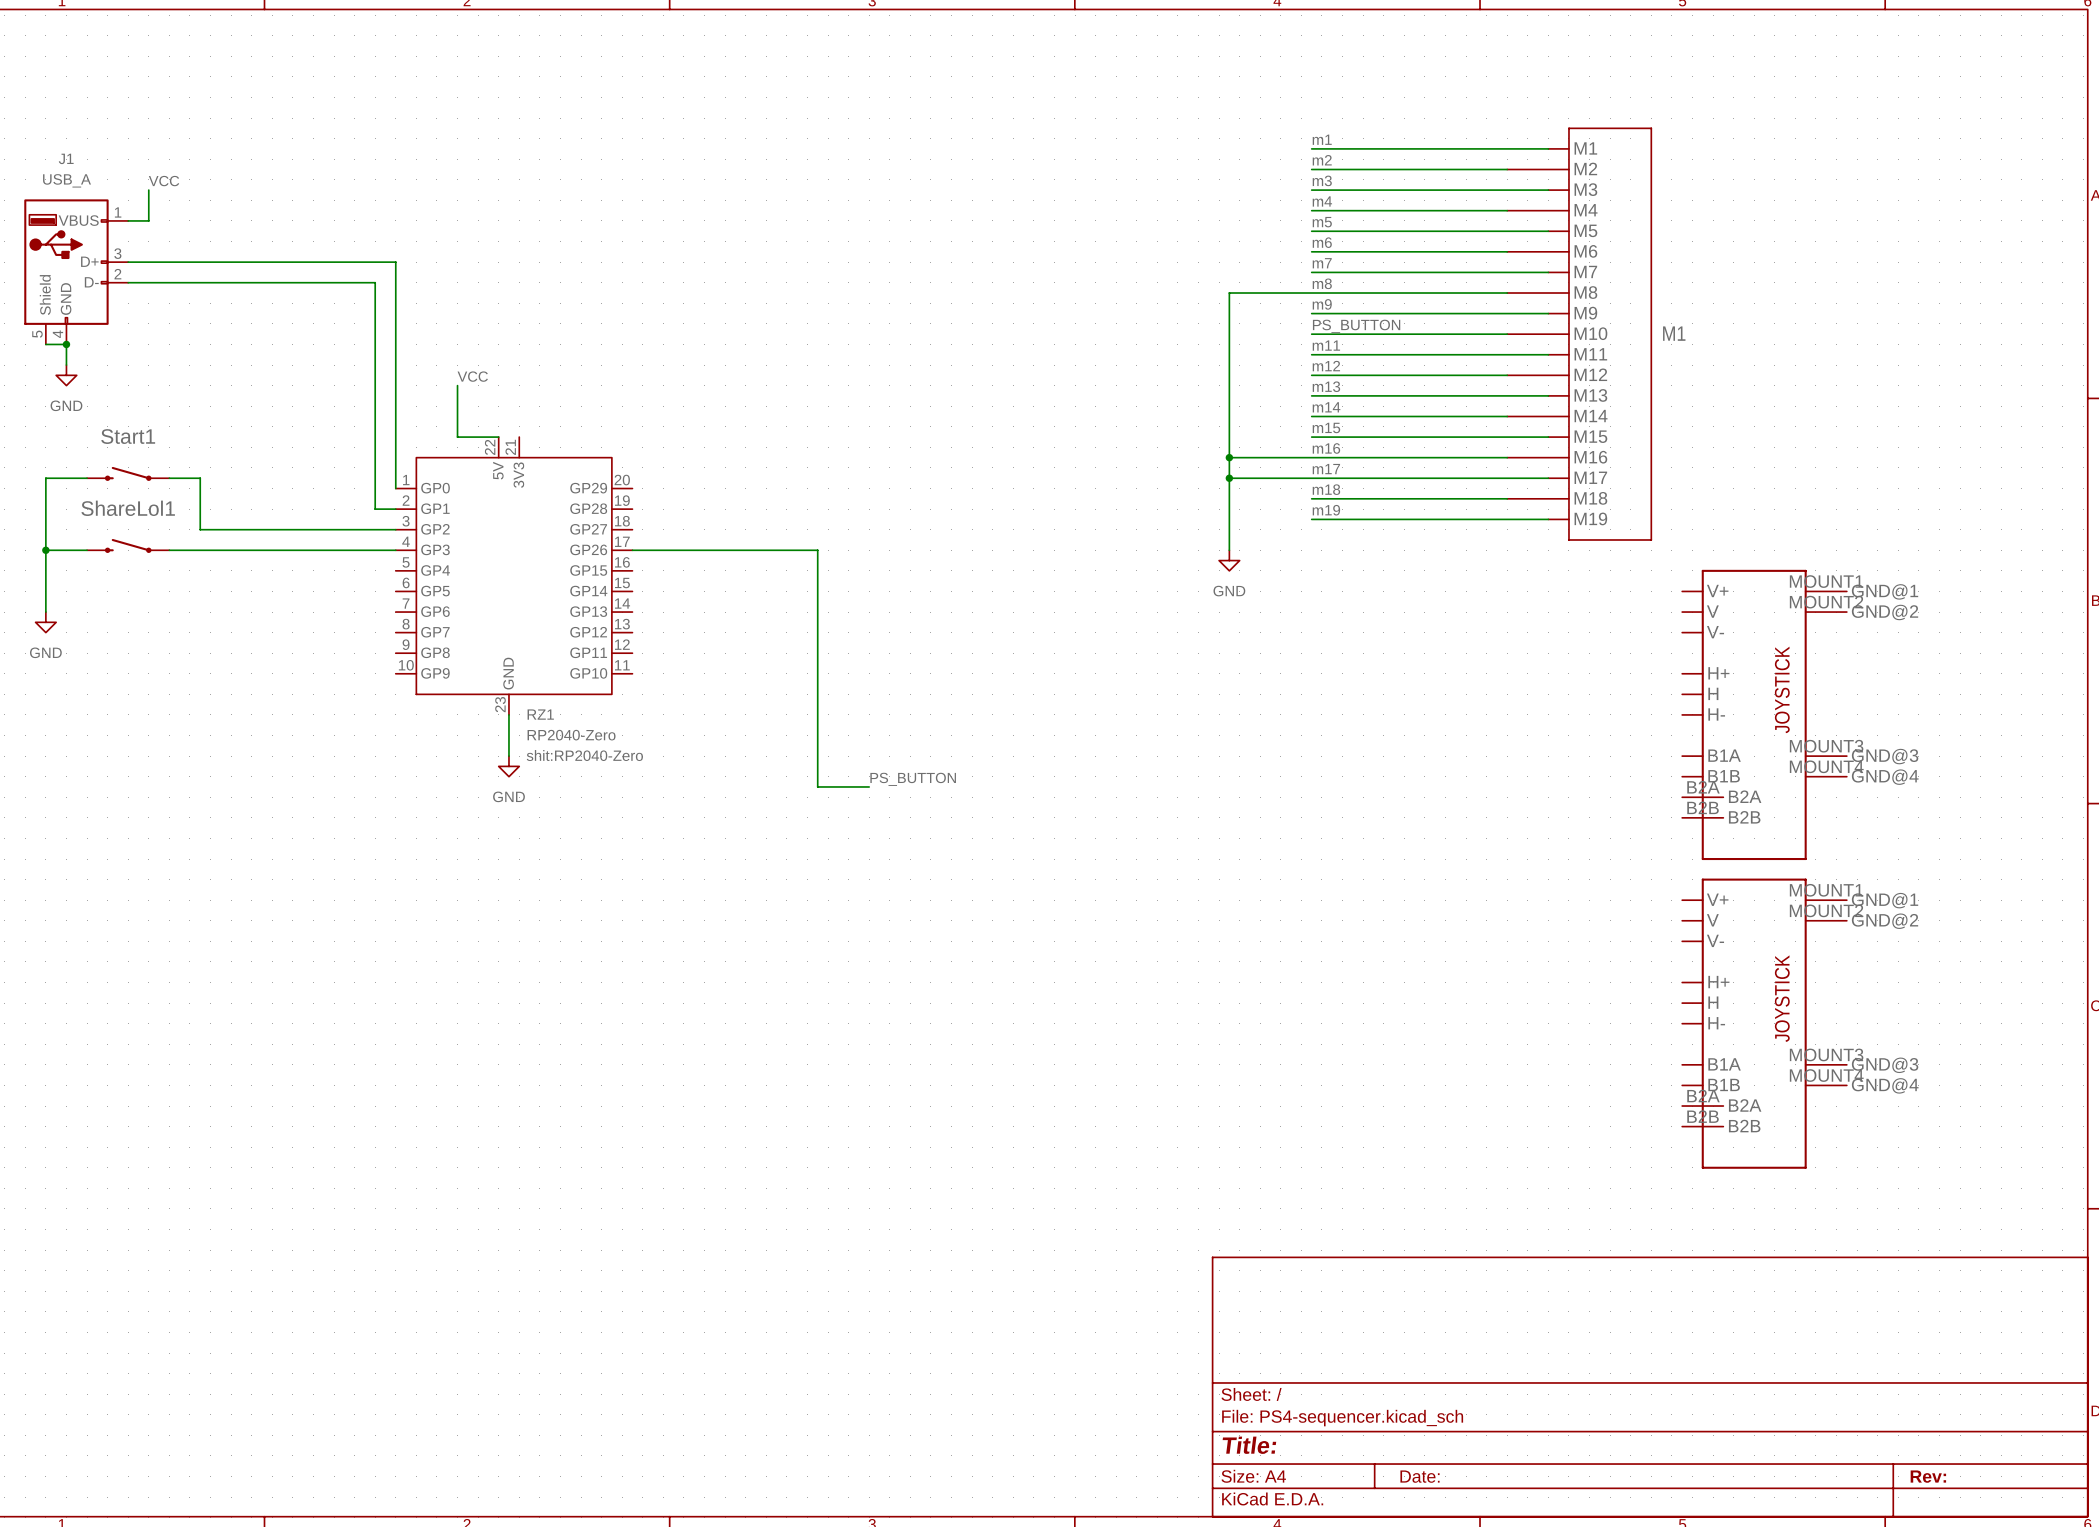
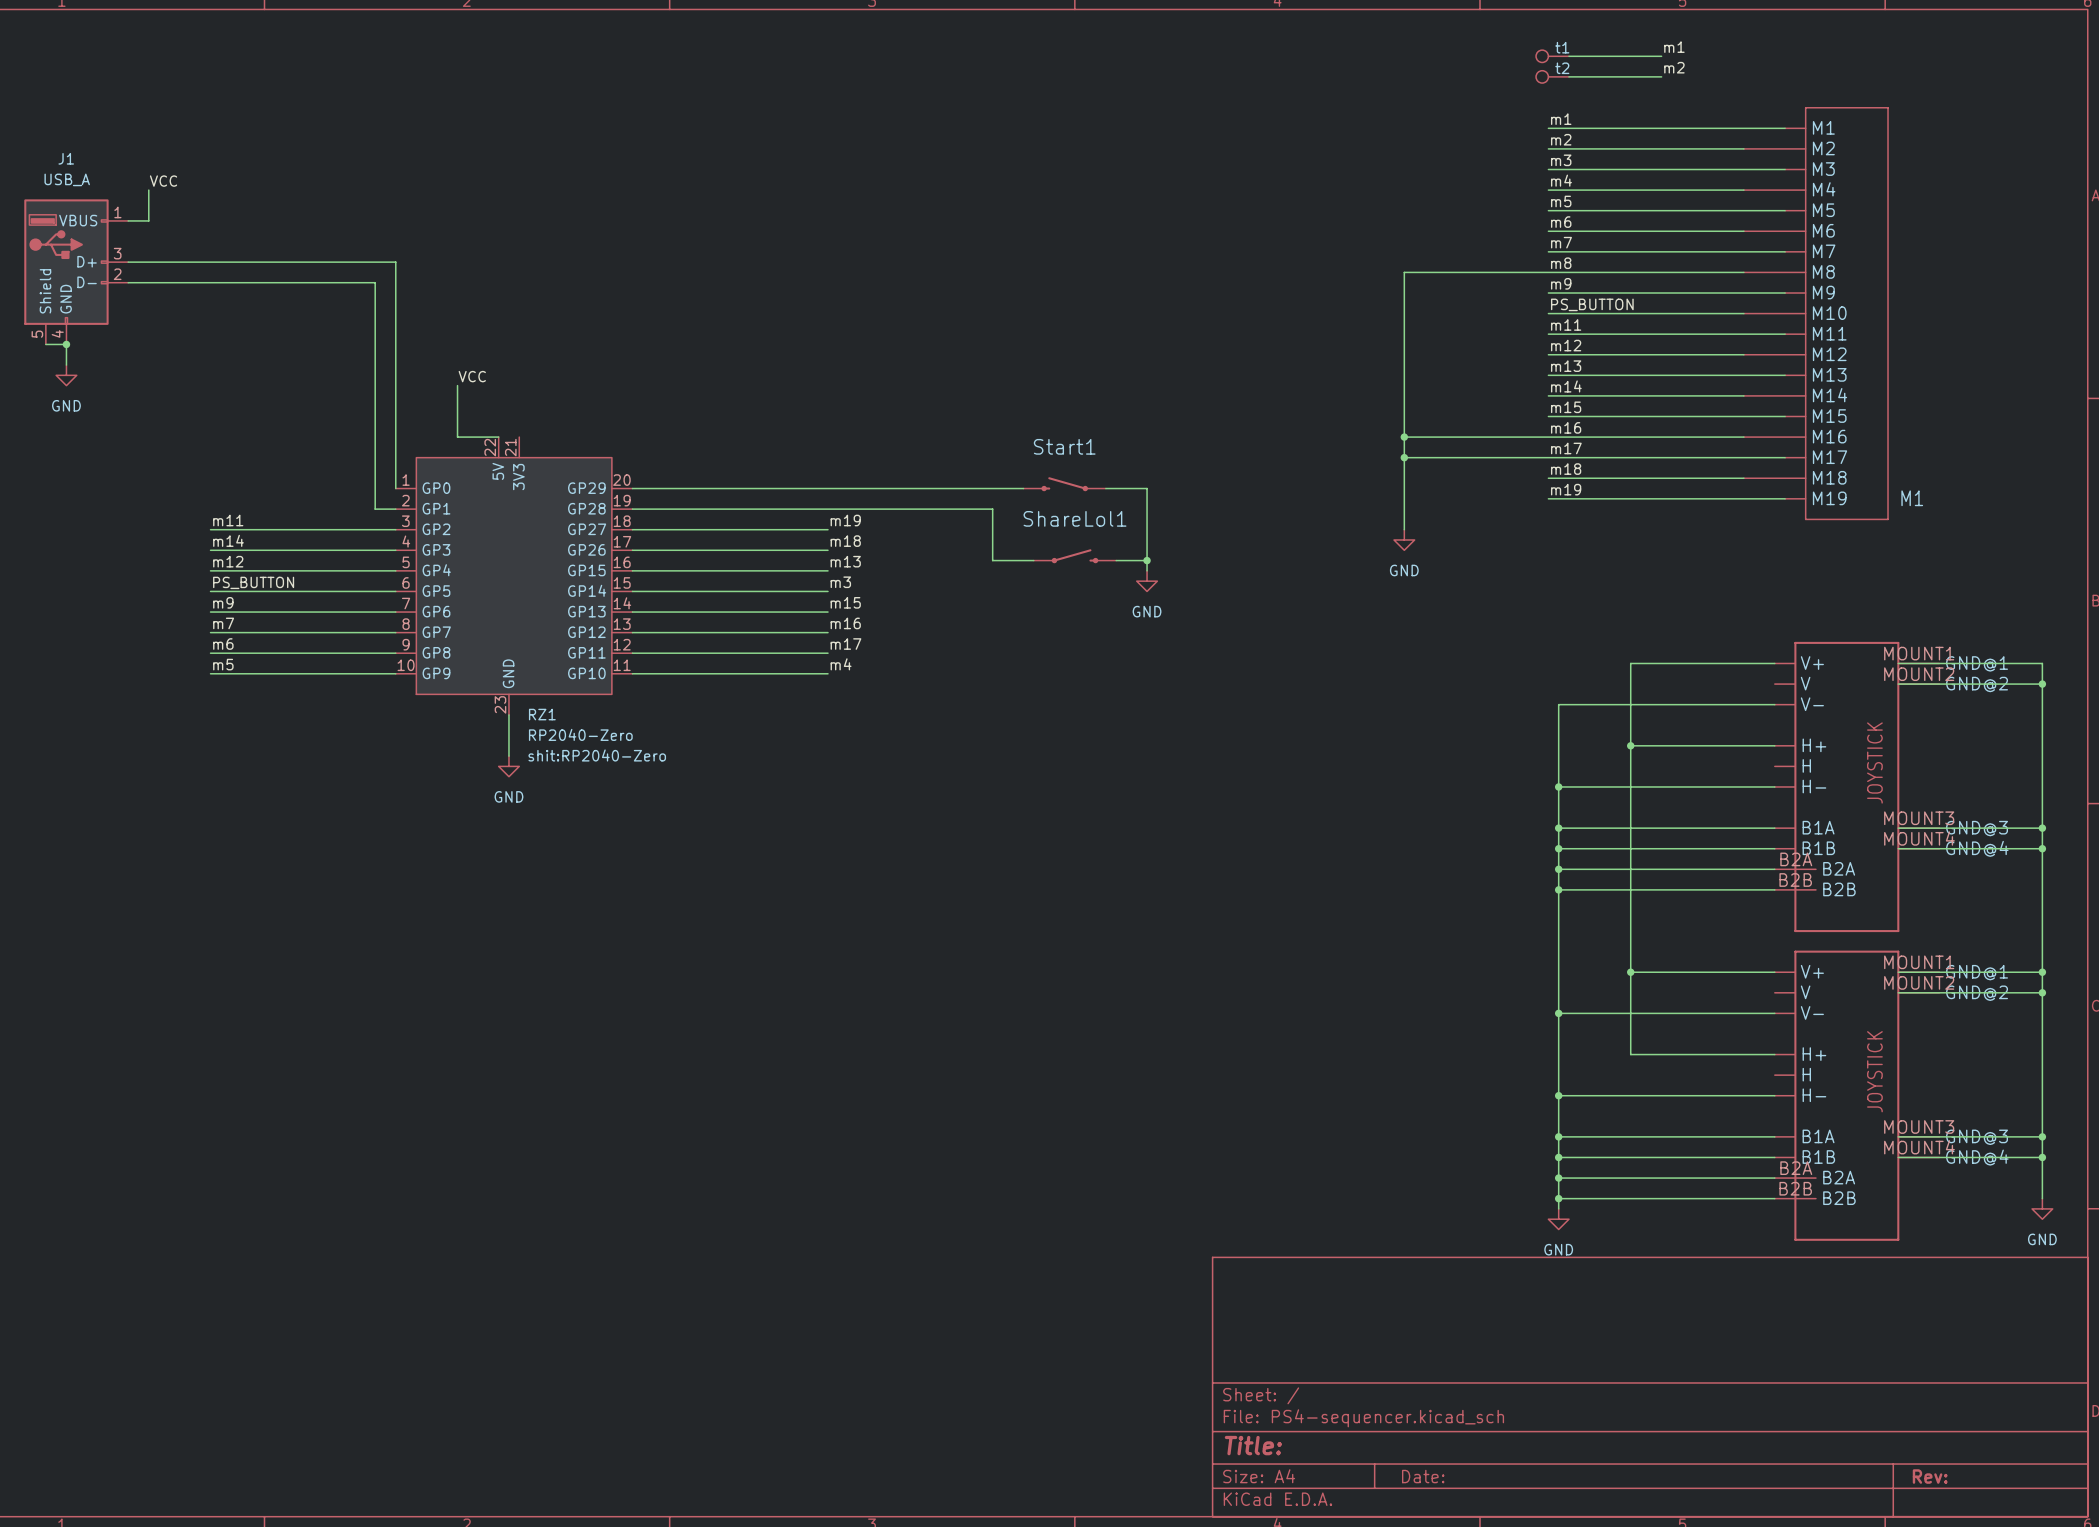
label: none -> m1 (1674, 47)
t1: none -> (1552, 56)
wire: none -> (1568, 56) (1661, 56)
label: none -> m2 (1674, 67)
t2: none -> (1552, 76)
wire: none -> (1568, 76) (1661, 76)
label: none -> m1 (1561, 119)
wire: none -> (1548, 128) (1785, 128)
label: m1 (1322, 139) -> none
label: none -> m2 (1561, 139)
wire: (1311, 148) (1548, 148) -> (1743, 148) (1548, 148)
label: m2 (1322, 160) -> none
label: none -> m3 (1561, 160)
wire: (1311, 169) (1507, 169) -> none
wire: none -> (1548, 169) (1785, 169)
label: m3 (1322, 180) -> none
label: none -> m4 (1561, 180)
wire: (1311, 190) (1548, 190) -> (1743, 190) (1548, 190)
label: m4 (1322, 201) -> none
label: none -> m5 (1561, 201)
wire: (1311, 210) (1507, 210) -> none
wire: none -> (1548, 210) (1785, 210)
label: m5 (1322, 222) -> none
label: none -> m6 (1561, 222)
wire: (1311, 231) (1548, 231) -> (1743, 231) (1548, 231)
label: m6 (1322, 242) -> none
label: none -> m7 (1561, 242)
wire: (1311, 251) (1507, 251) -> none
wire: none -> (1548, 251) (1785, 251)
label: m7 (1322, 263) -> none
label: none -> m8 (1561, 263)
wire: (1311, 272) (1404, 272) -> (1404, 529) (1404, 272)
wire: none -> (1548, 272) (1743, 272)
label: m8 (1322, 283) -> none
label: none -> m9 (1561, 283)
wire: (1507, 293) (1229, 293) (1229, 550) -> none
wire: none -> (1548, 293) (1785, 293)
label: m9 (1322, 304) -> none
label: none -> PS_BUTTON (1592, 304)
wire: (1311, 313) (1548, 313) -> (1743, 313) (1548, 313)
label: none -> m11 (1566, 324)
label: PS_BUTTON (1356, 326) -> none
M1 name position: M1 (1674, 333) -> M1 (1912, 498)
wire: (1311, 334) (1507, 334) -> none
wire: none -> (1548, 334) (1785, 334)
M1 position: (1579, 334) -> (1816, 313)
label: m11 (1326, 345) -> none
label: none -> m12 (1566, 345)
wire: (1311, 354) (1548, 354) -> (1743, 354) (1548, 354)
label: m12 (1326, 366) -> none
label: none -> m13 (1566, 366)
wire: (1311, 375) (1507, 375) -> none
wire: none -> (1548, 375) (1785, 375)
label: m13 (1326, 386) -> none
label: none -> m14 (1566, 386)
wire: (1311, 395) (1548, 395) -> (1743, 395) (1548, 395)
label: m14 (1326, 407) -> none
label: none -> m15 (1566, 407)
wire: (1311, 416) (1507, 416) -> none
wire: none -> (1548, 416) (1785, 416)
label: m15 (1326, 427) -> none
label: none -> m16 (1566, 427)
wire: (1311, 437) (1404, 437) -> none
junction: none -> (1404, 437)
wire: none -> (1548, 437) (1743, 437)
label: m16 (1326, 448) -> none
label: none -> m17 (1566, 448)
wire: (1229, 457) (1404, 457) -> none
junction: (1229, 457) -> none
junction: none -> (1404, 457)
wire: none -> (1507, 457) (1785, 457)
label: m17 (1326, 469) -> none
label: none -> m18 (1566, 469)
Start1 position: (128, 473) -> (1064, 484)
wire: (87, 478) (45, 478) (45, 612) -> none
wire: (169, 478) (200, 478) (200, 529) (210, 529) -> none
wire: (1229, 478) (1548, 478) -> (1743, 478) (1548, 478)
junction: (1229, 478) -> none
wire: none -> (632, 488) (1023, 488)
wire: none -> (1105, 488) (1147, 488) (1147, 570)
label: m18 (1326, 489) -> none
label: none -> m19 (1566, 489)
wire: (1311, 498) (1507, 498) -> none
wire: none -> (1548, 498) (1785, 498)
wire: none -> (632, 509) (992, 509) (992, 560) (1033, 560)
label: m19 (1326, 510) -> none
wire: (1311, 519) (1548, 519) -> none
label: none -> m11 (228, 520)
label: none -> m19 (845, 520)
wire: none -> (632, 529) (828, 529)
power symbol: none -> GND (1404, 539)
label: none -> m14 (228, 540)
label: none -> m18 (845, 541)
ShareLol1 flip: as is (128, 545) -> left-right (1075, 556)
ShareLol1 position: (128, 545) -> (1075, 556)
wire: (45, 550) (87, 550) -> none
junction: (45, 550) -> none
wire: (169, 550) (210, 550) -> none
wire: (817, 550) (817, 786) (869, 786) -> (817, 550) (828, 550)
wire: none -> (1116, 560) (1147, 560)
junction: none -> (1147, 560)
power symbol position: GND (1229, 560) -> GND (1147, 581)
label: none -> m12 (228, 561)
label: none -> m13 (845, 561)
wire: none -> (210, 570) (395, 570)
wire: none -> (632, 570) (828, 570)
label: none -> m3 (840, 582)
label: none -> PS_BUTTON (253, 582)
wire: none -> (210, 591) (395, 591)
wire: none -> (632, 591) (828, 591)
label: none -> m9 (223, 602)
label: none -> m15 (845, 602)
wire: none -> (210, 612) (395, 612)
wire: none -> (632, 612) (828, 612)
power symbol: GND (45, 622) -> none
label: none -> m7 (223, 623)
label: none -> m16 (845, 623)
wire: none -> (210, 632) (395, 632)
wire: none -> (632, 632) (828, 632)
label: none -> m6 (223, 644)
label: none -> m17 (845, 644)
wire: none -> (210, 653) (395, 653)
wire: none -> (632, 653) (828, 653)
wire: none -> (1774, 663) (1630, 663) (1630, 1054) (1774, 1054)
wire: none -> (1898, 663) (2042, 663) (2042, 1198)
label: none -> m5 (223, 664)
label: none -> m4 (841, 664)
wire: none -> (210, 673) (395, 673)
wire: none -> (632, 673) (828, 673)
wire: none -> (1898, 684) (2042, 684)
junction: none -> (2042, 684)
wire: none -> (1774, 704) (1558, 704) (1558, 1208)
part position: (1764, 714) -> (1857, 786)
wire: none -> (1630, 745) (1774, 745)
junction: none -> (1630, 745)
label: PS_BUTTON (913, 779) -> none
wire: none -> (1558, 786) (1774, 786)
junction: none -> (1558, 786)
wire: none -> (1558, 828) (1774, 828)
junction: none -> (1558, 828)
wire: none -> (1898, 828) (2042, 828)
junction: none -> (2042, 828)
wire: none -> (1558, 848) (1774, 848)
junction: none -> (1558, 848)
wire: none -> (1898, 848) (2042, 848)
junction: none -> (2042, 848)
wire: none -> (1558, 869) (1774, 869)
junction: none -> (1558, 869)
wire: none -> (1558, 889) (1774, 889)
junction: none -> (1558, 889)
wire: none -> (1630, 972) (1774, 972)
junction: none -> (1630, 972)
wire: none -> (1898, 972) (2042, 972)
junction: none -> (2042, 972)
wire: none -> (1898, 992) (2042, 992)
junction: none -> (2042, 992)
wire: none -> (1558, 1013) (1774, 1013)
junction: none -> (1558, 1013)
part position: (1764, 1023) -> (1857, 1095)
wire: none -> (1558, 1095) (1774, 1095)
junction: none -> (1558, 1095)
wire: none -> (1558, 1136) (1774, 1136)
junction: none -> (1558, 1136)
wire: none -> (1898, 1136) (2042, 1136)
junction: none -> (2042, 1136)
wire: none -> (1558, 1157) (1774, 1157)
junction: none -> (1558, 1157)
wire: none -> (1898, 1157) (2042, 1157)
junction: none -> (2042, 1157)
wire: none -> (1558, 1178) (1774, 1178)
junction: none -> (1558, 1178)
wire: none -> (1558, 1198) (1774, 1198)
junction: none -> (1558, 1198)
power symbol: none -> GND (2042, 1208)
power symbol: none -> GND (1558, 1219)

